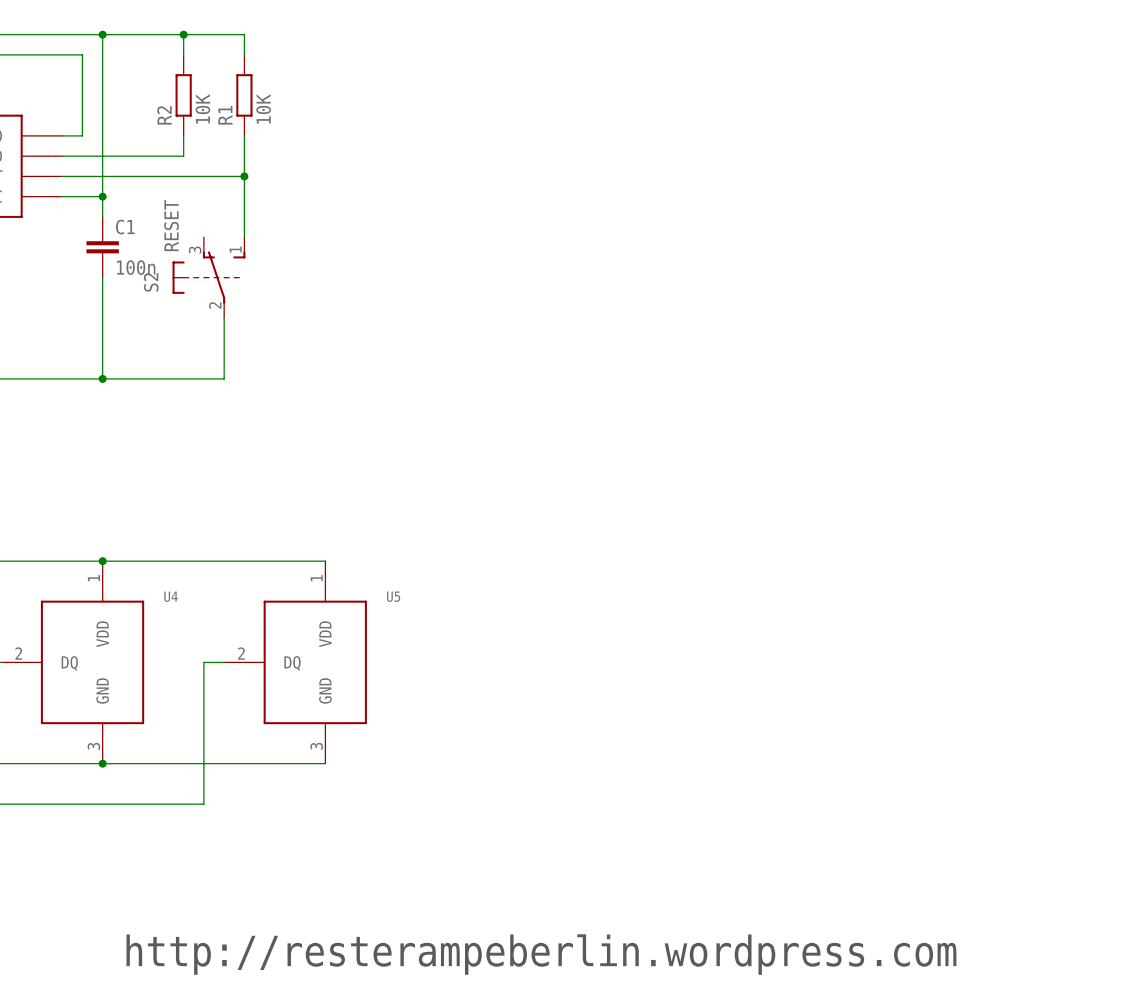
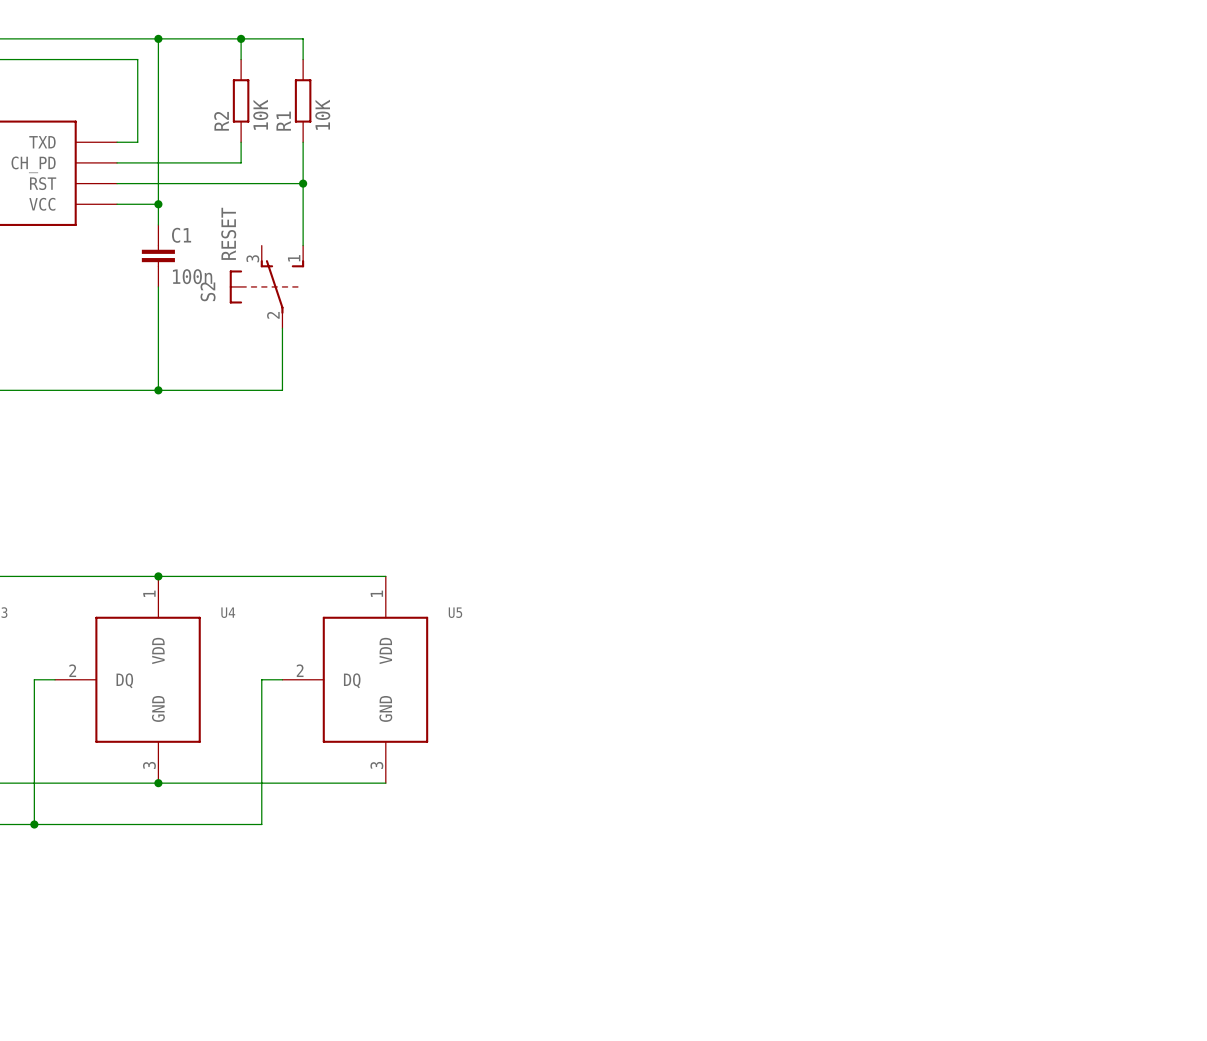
text: http://resterampeberlin.wordpress.com (541, 954) -> none

